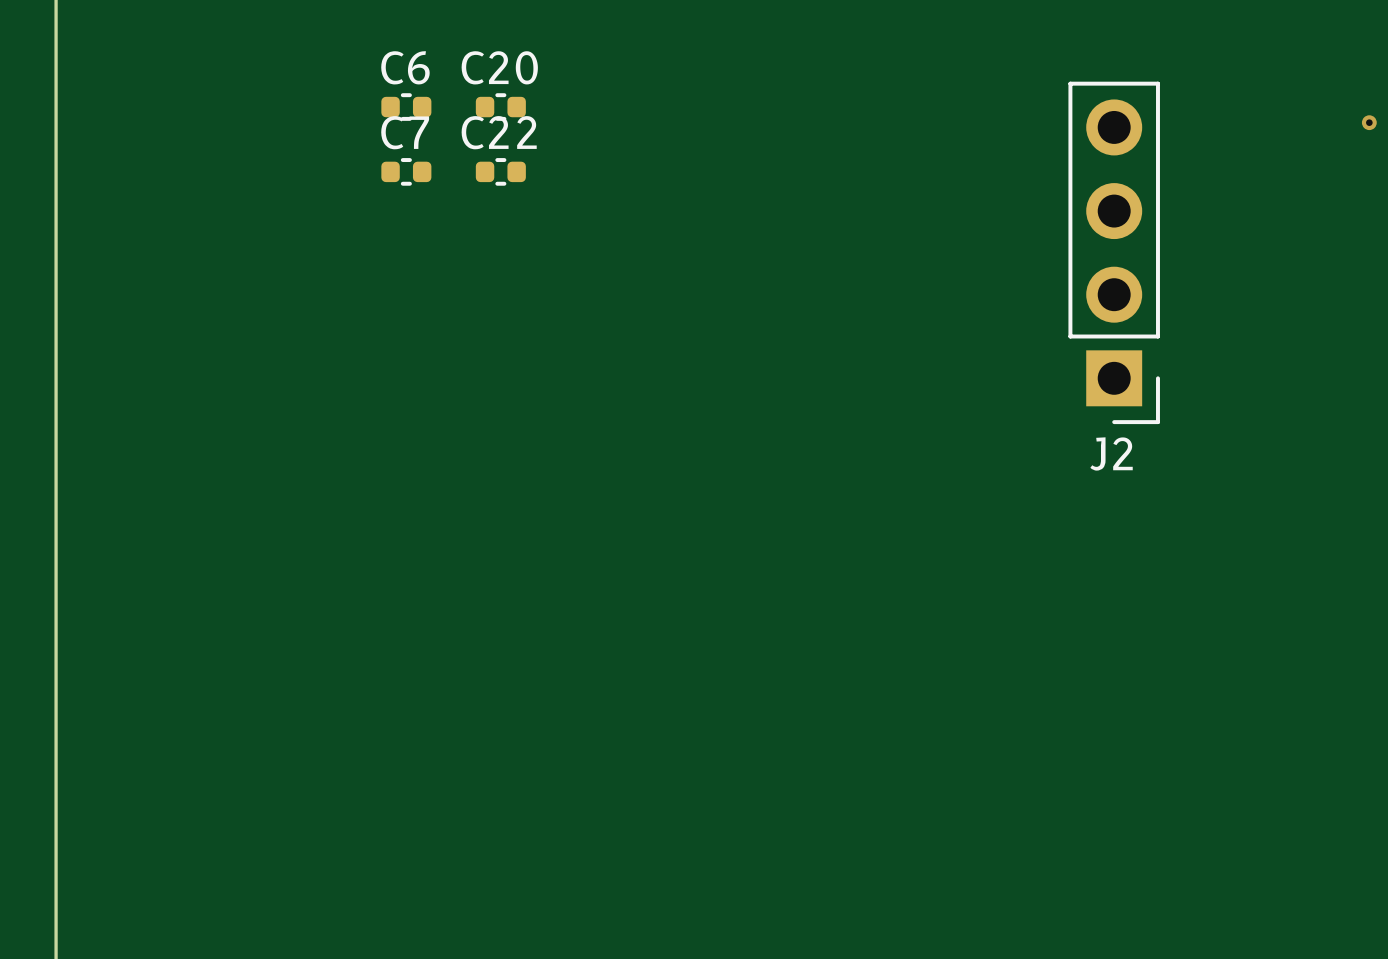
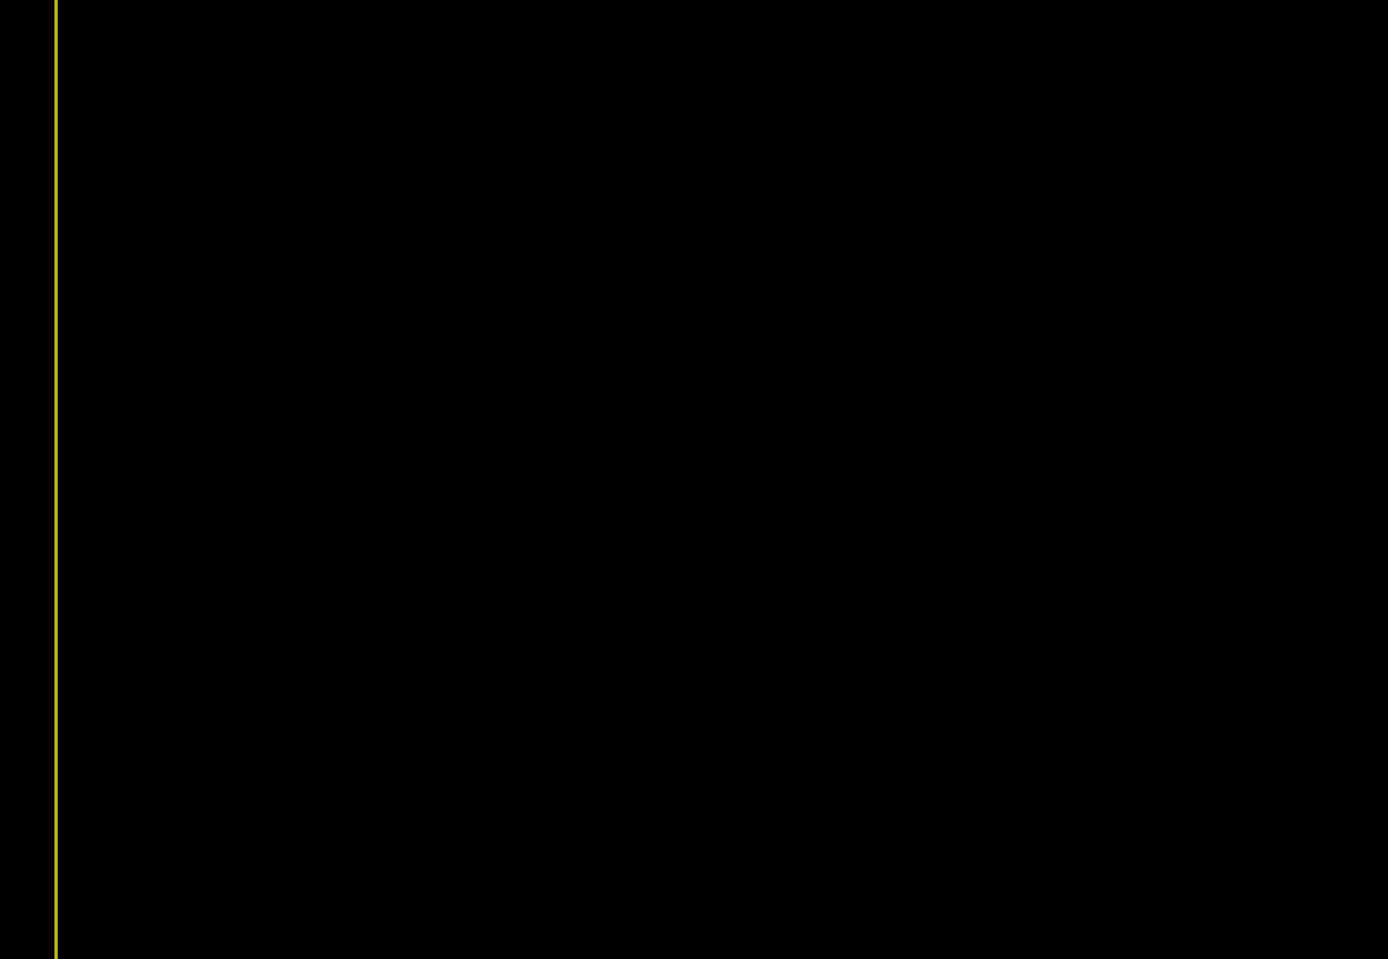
C6: (406, 107) -> none
C20: (500, 107) -> none
via: (1369, 122) -> none
C7: (406, 171) -> none
C22: (500, 171) -> none
J2: (1114, 252) -> none

